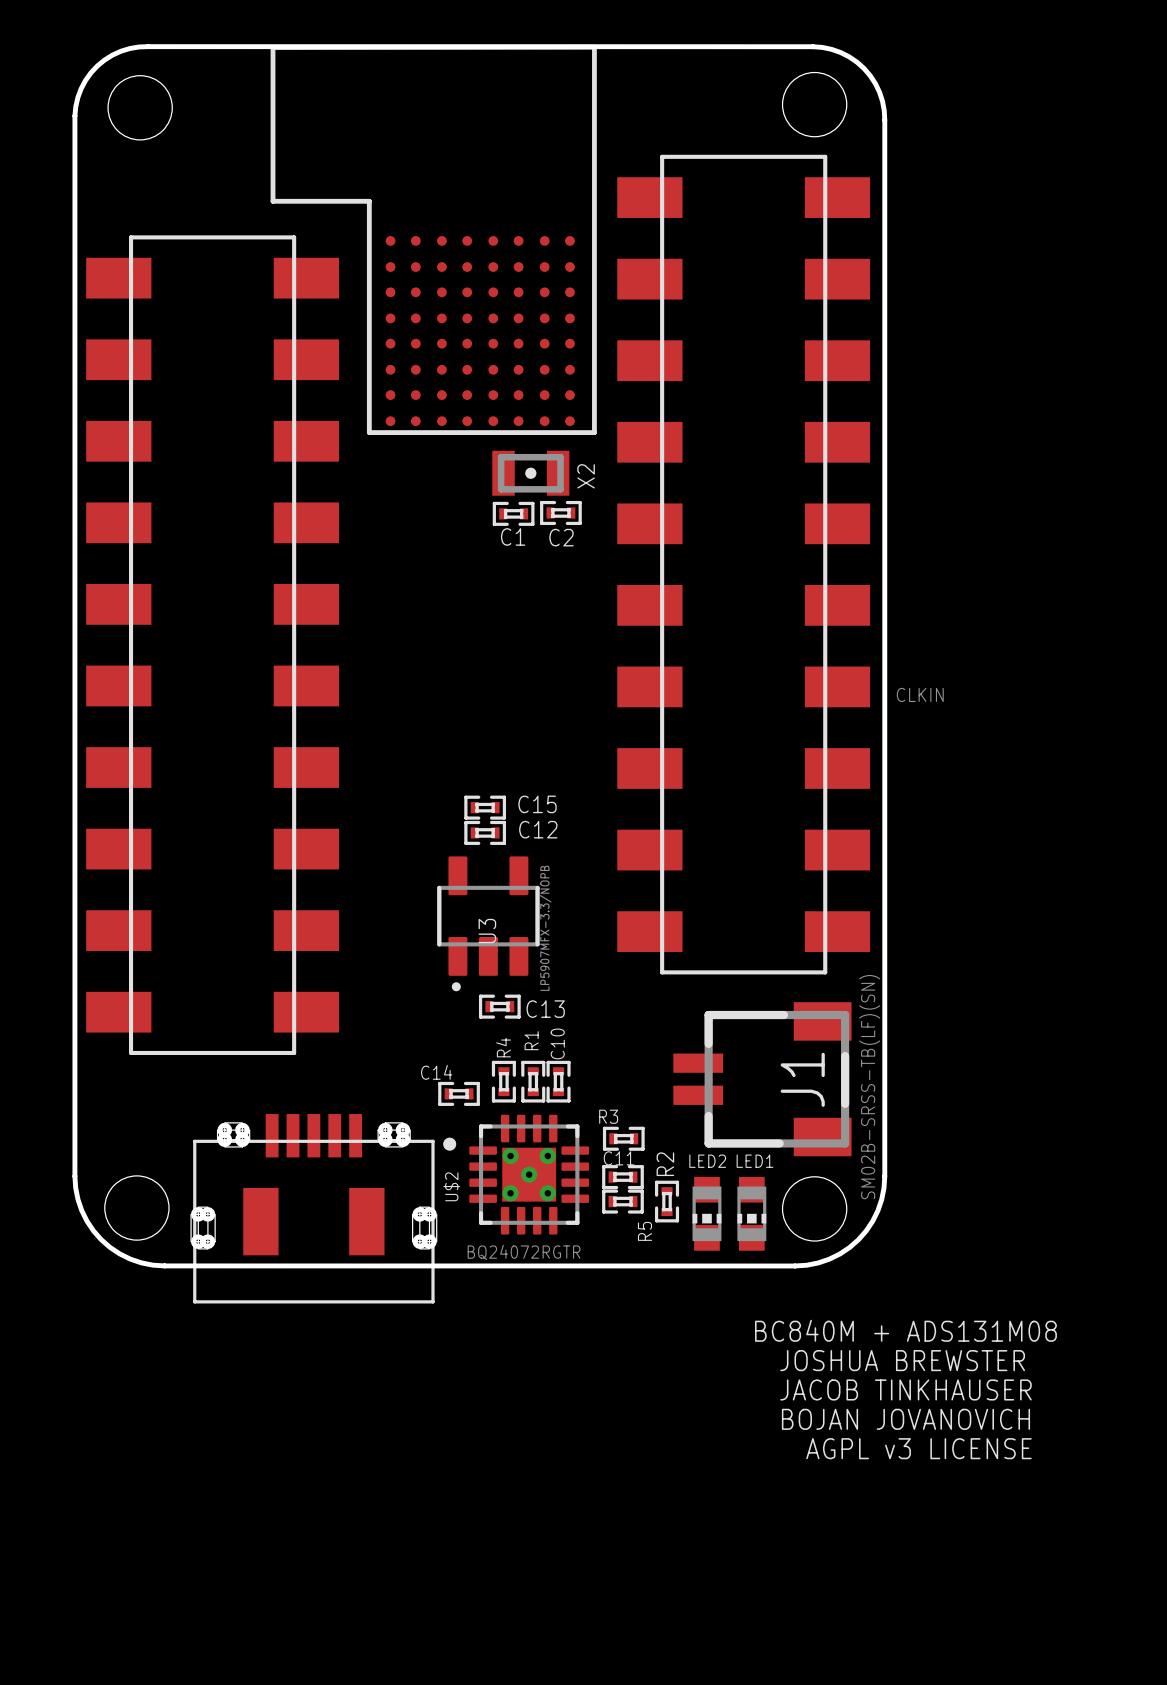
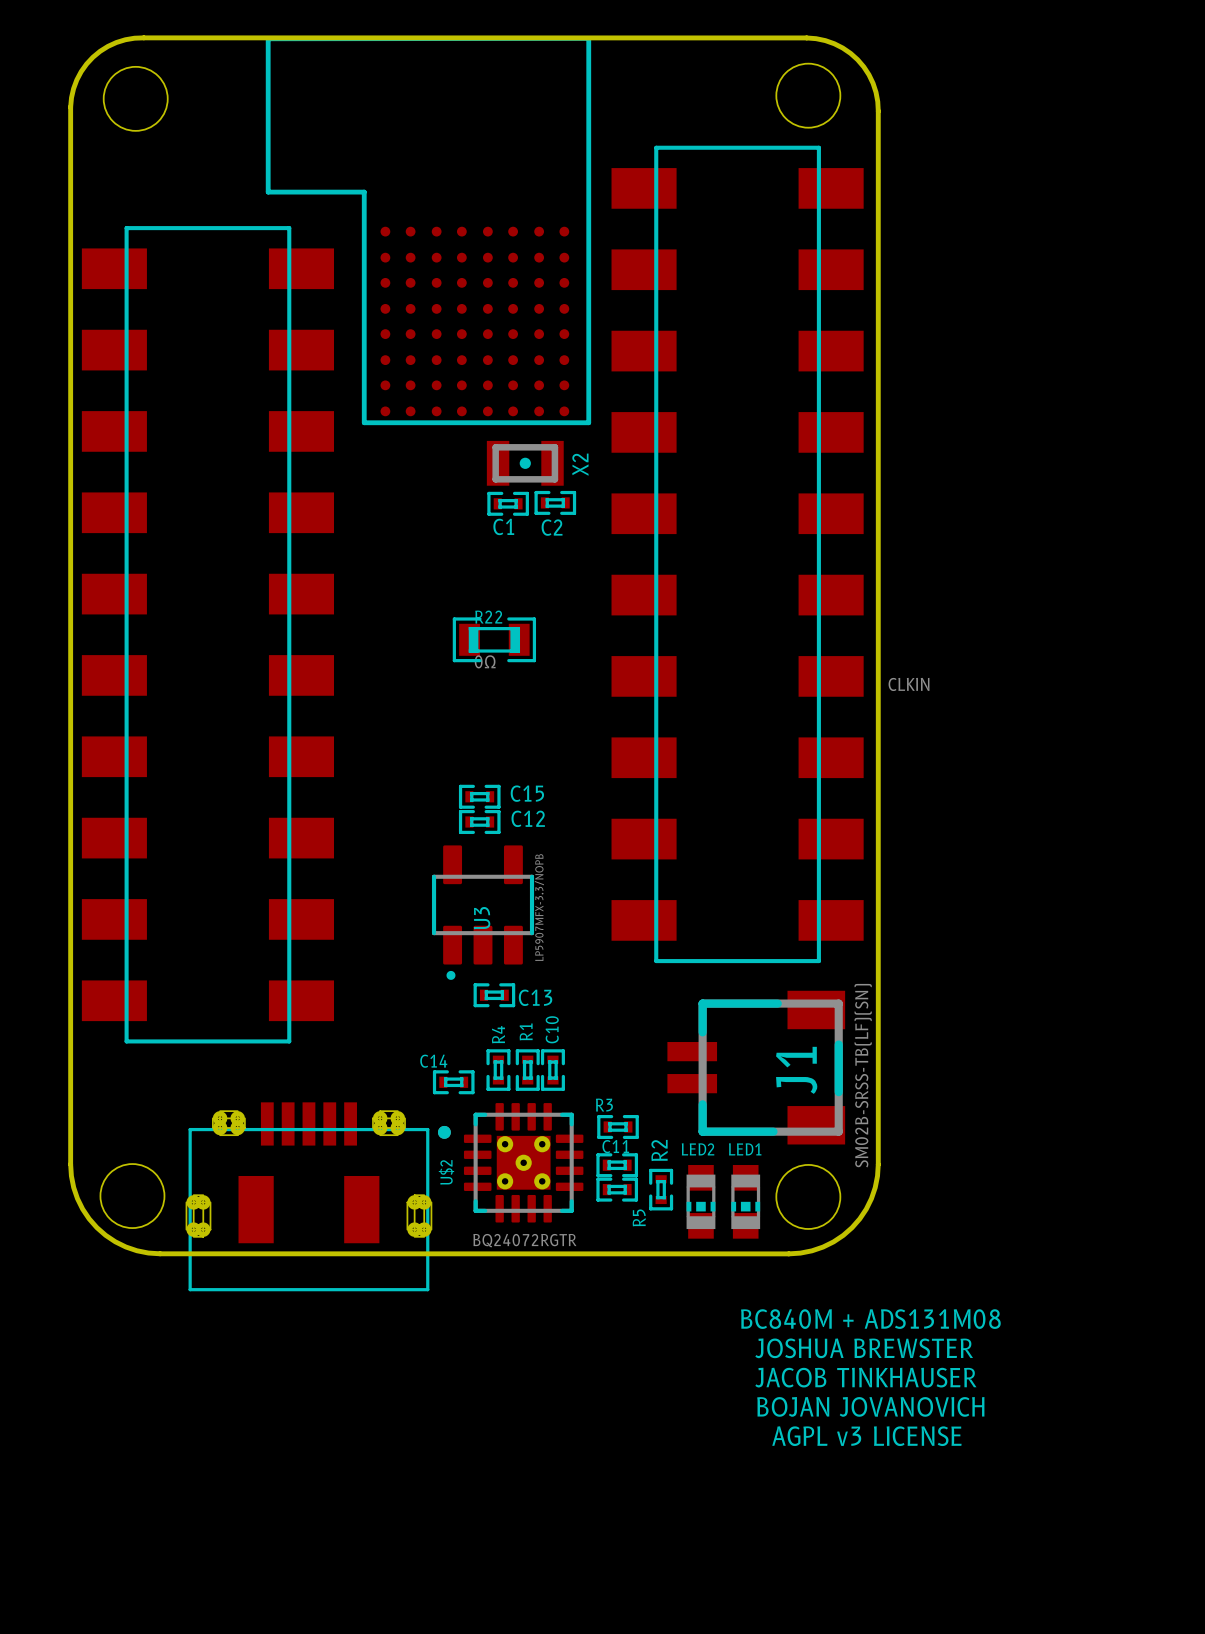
R22: none -> 0Ω (494, 639)

